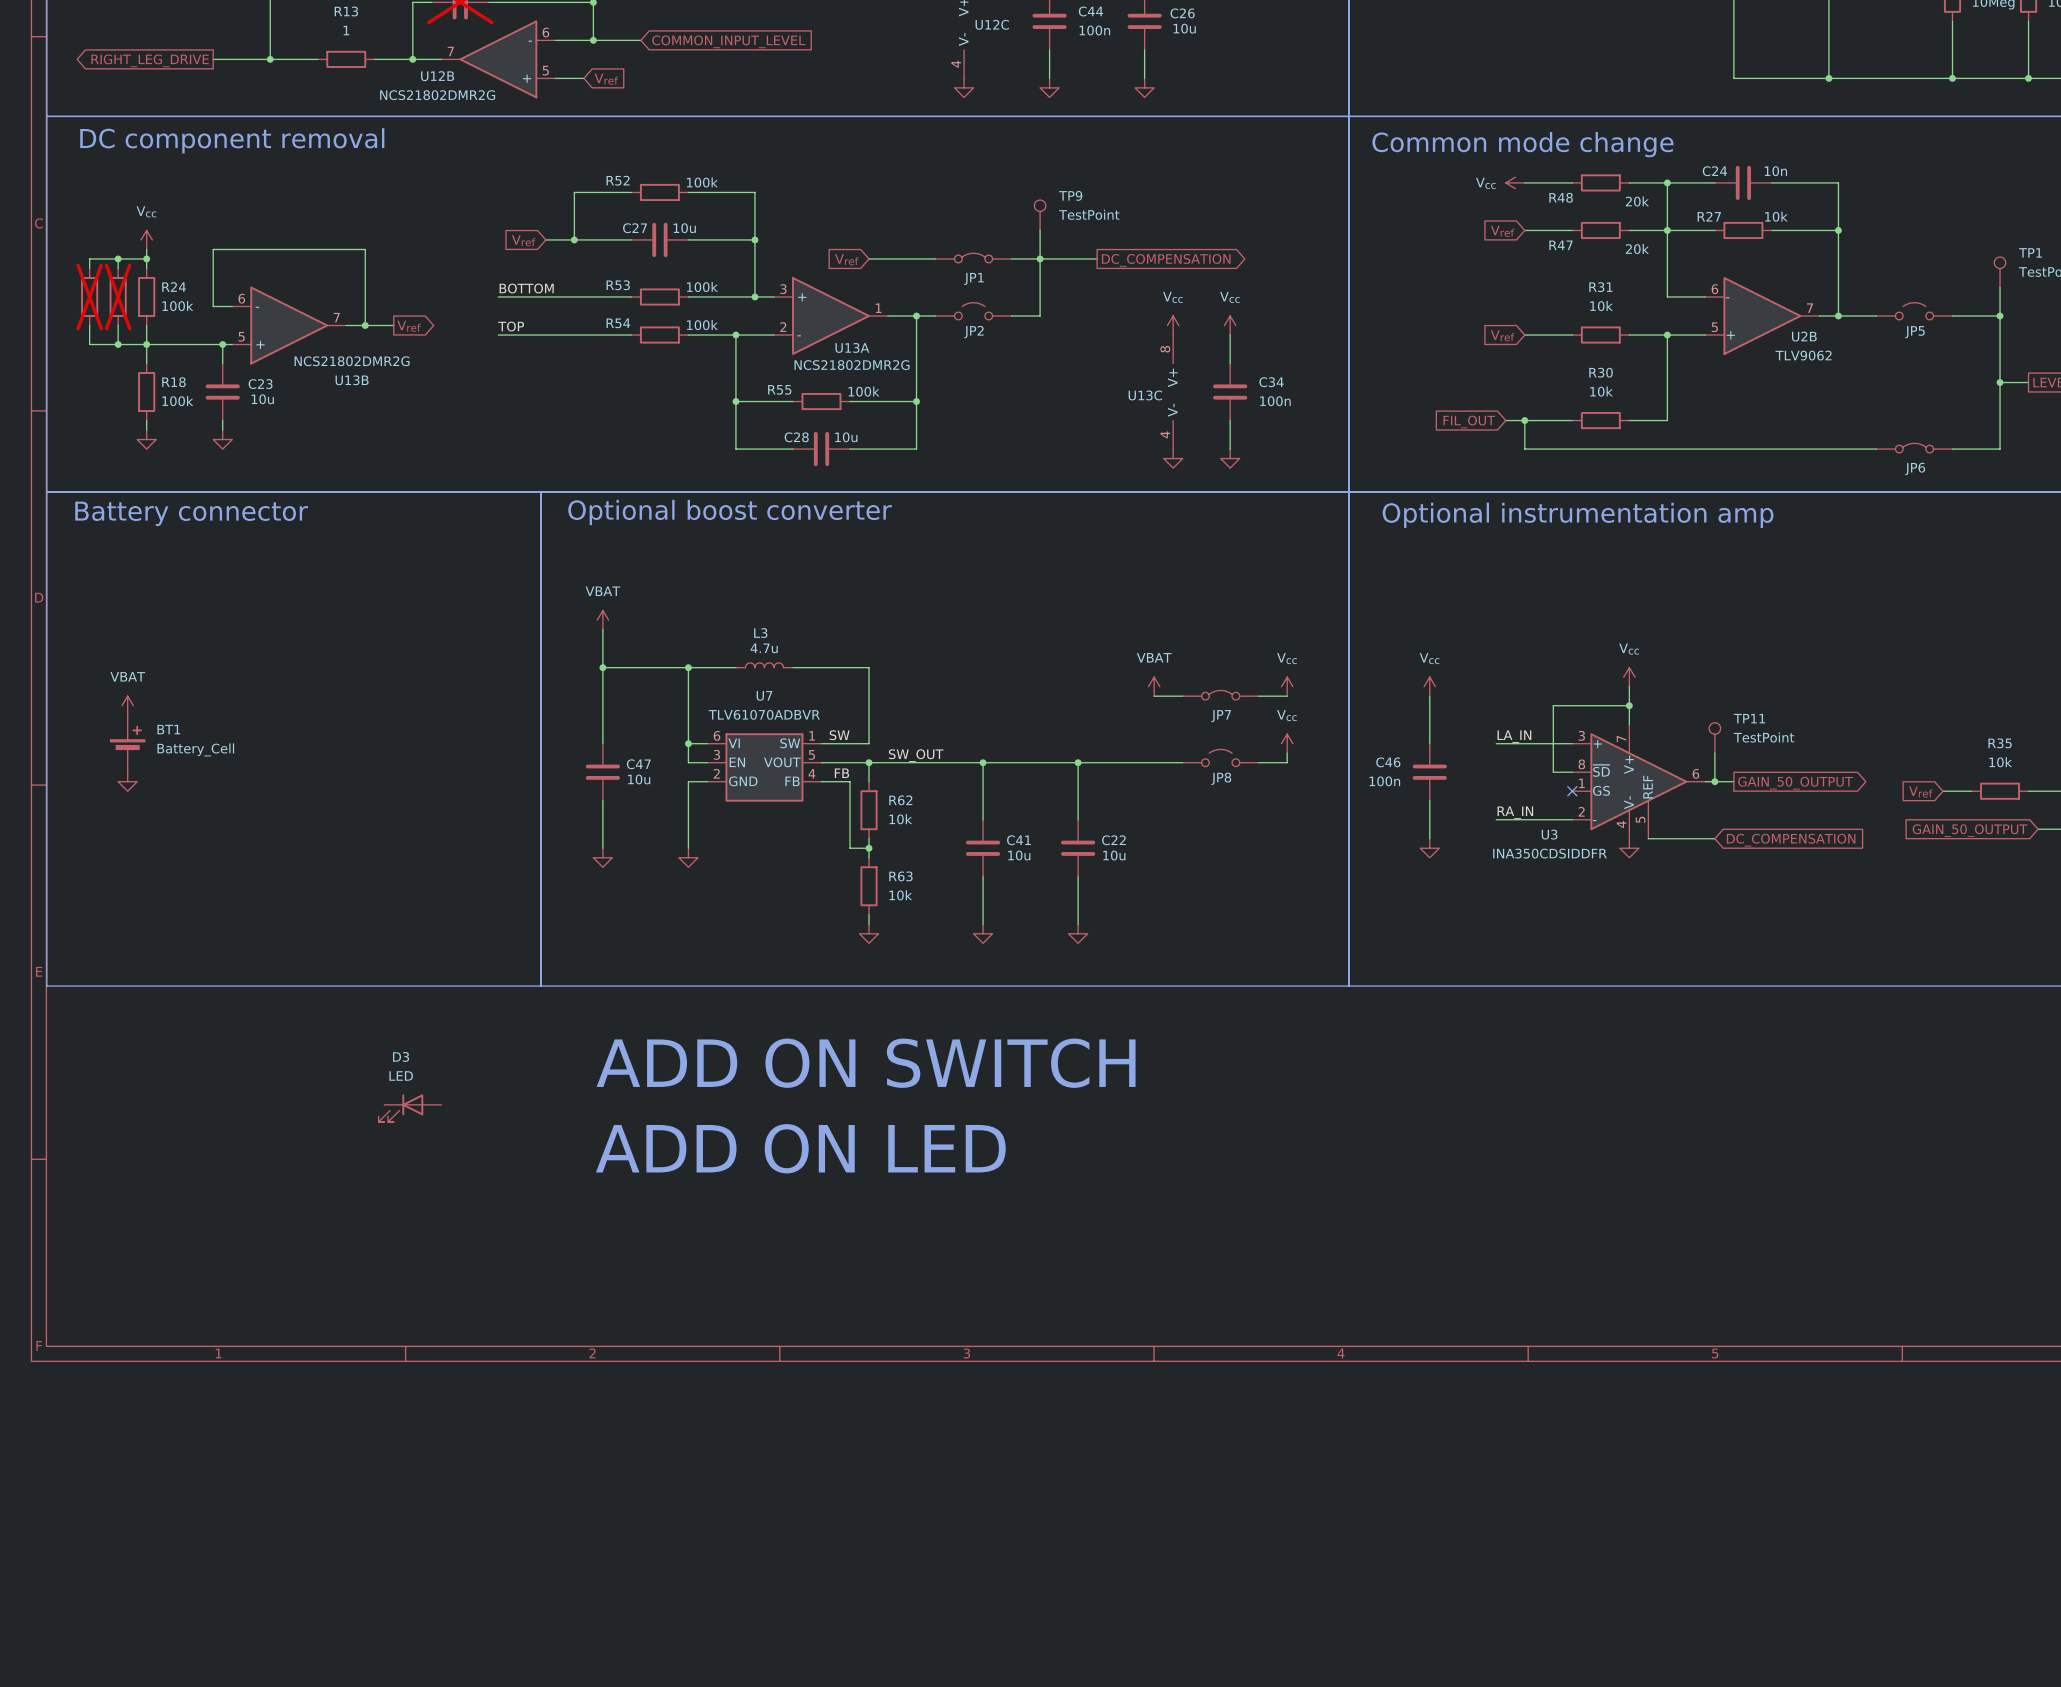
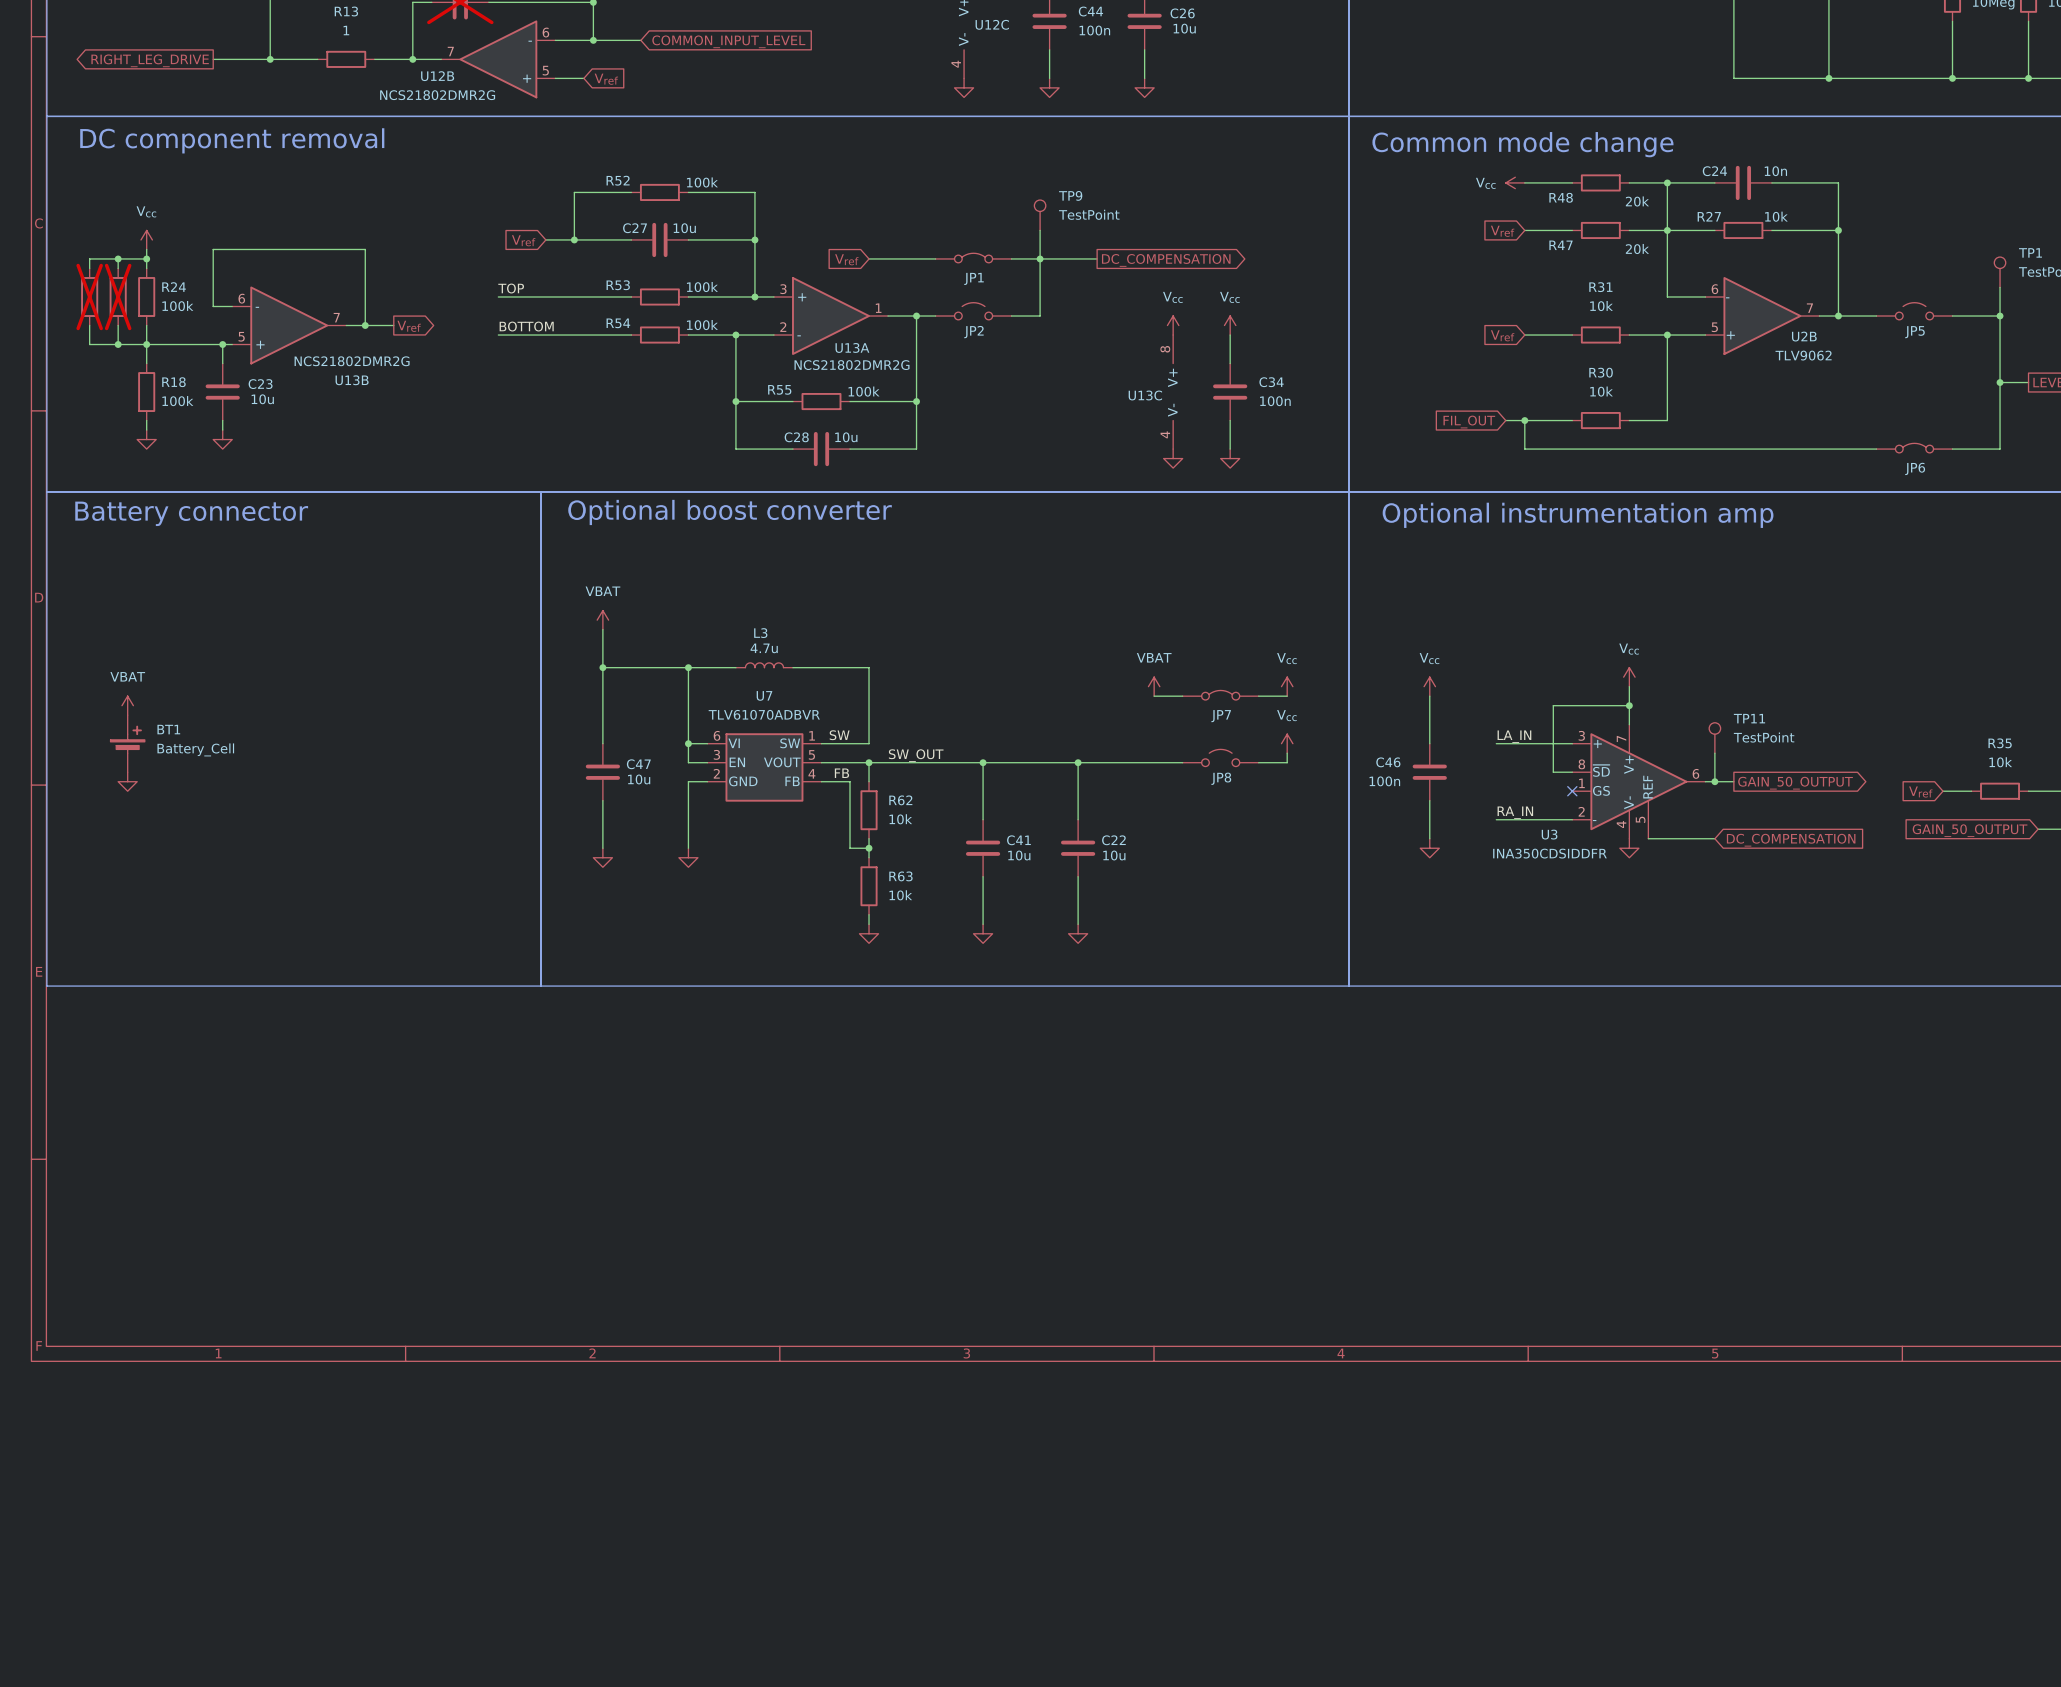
label: BOTTOM (526, 288) -> TOP (511, 288)
label: TOP (511, 326) -> BOTTOM (526, 326)
text: ADD ON SWITCH (866, 1063) -> none
D3: LED (409, 1108) -> none
text: ADD ON LED (800, 1148) -> none

